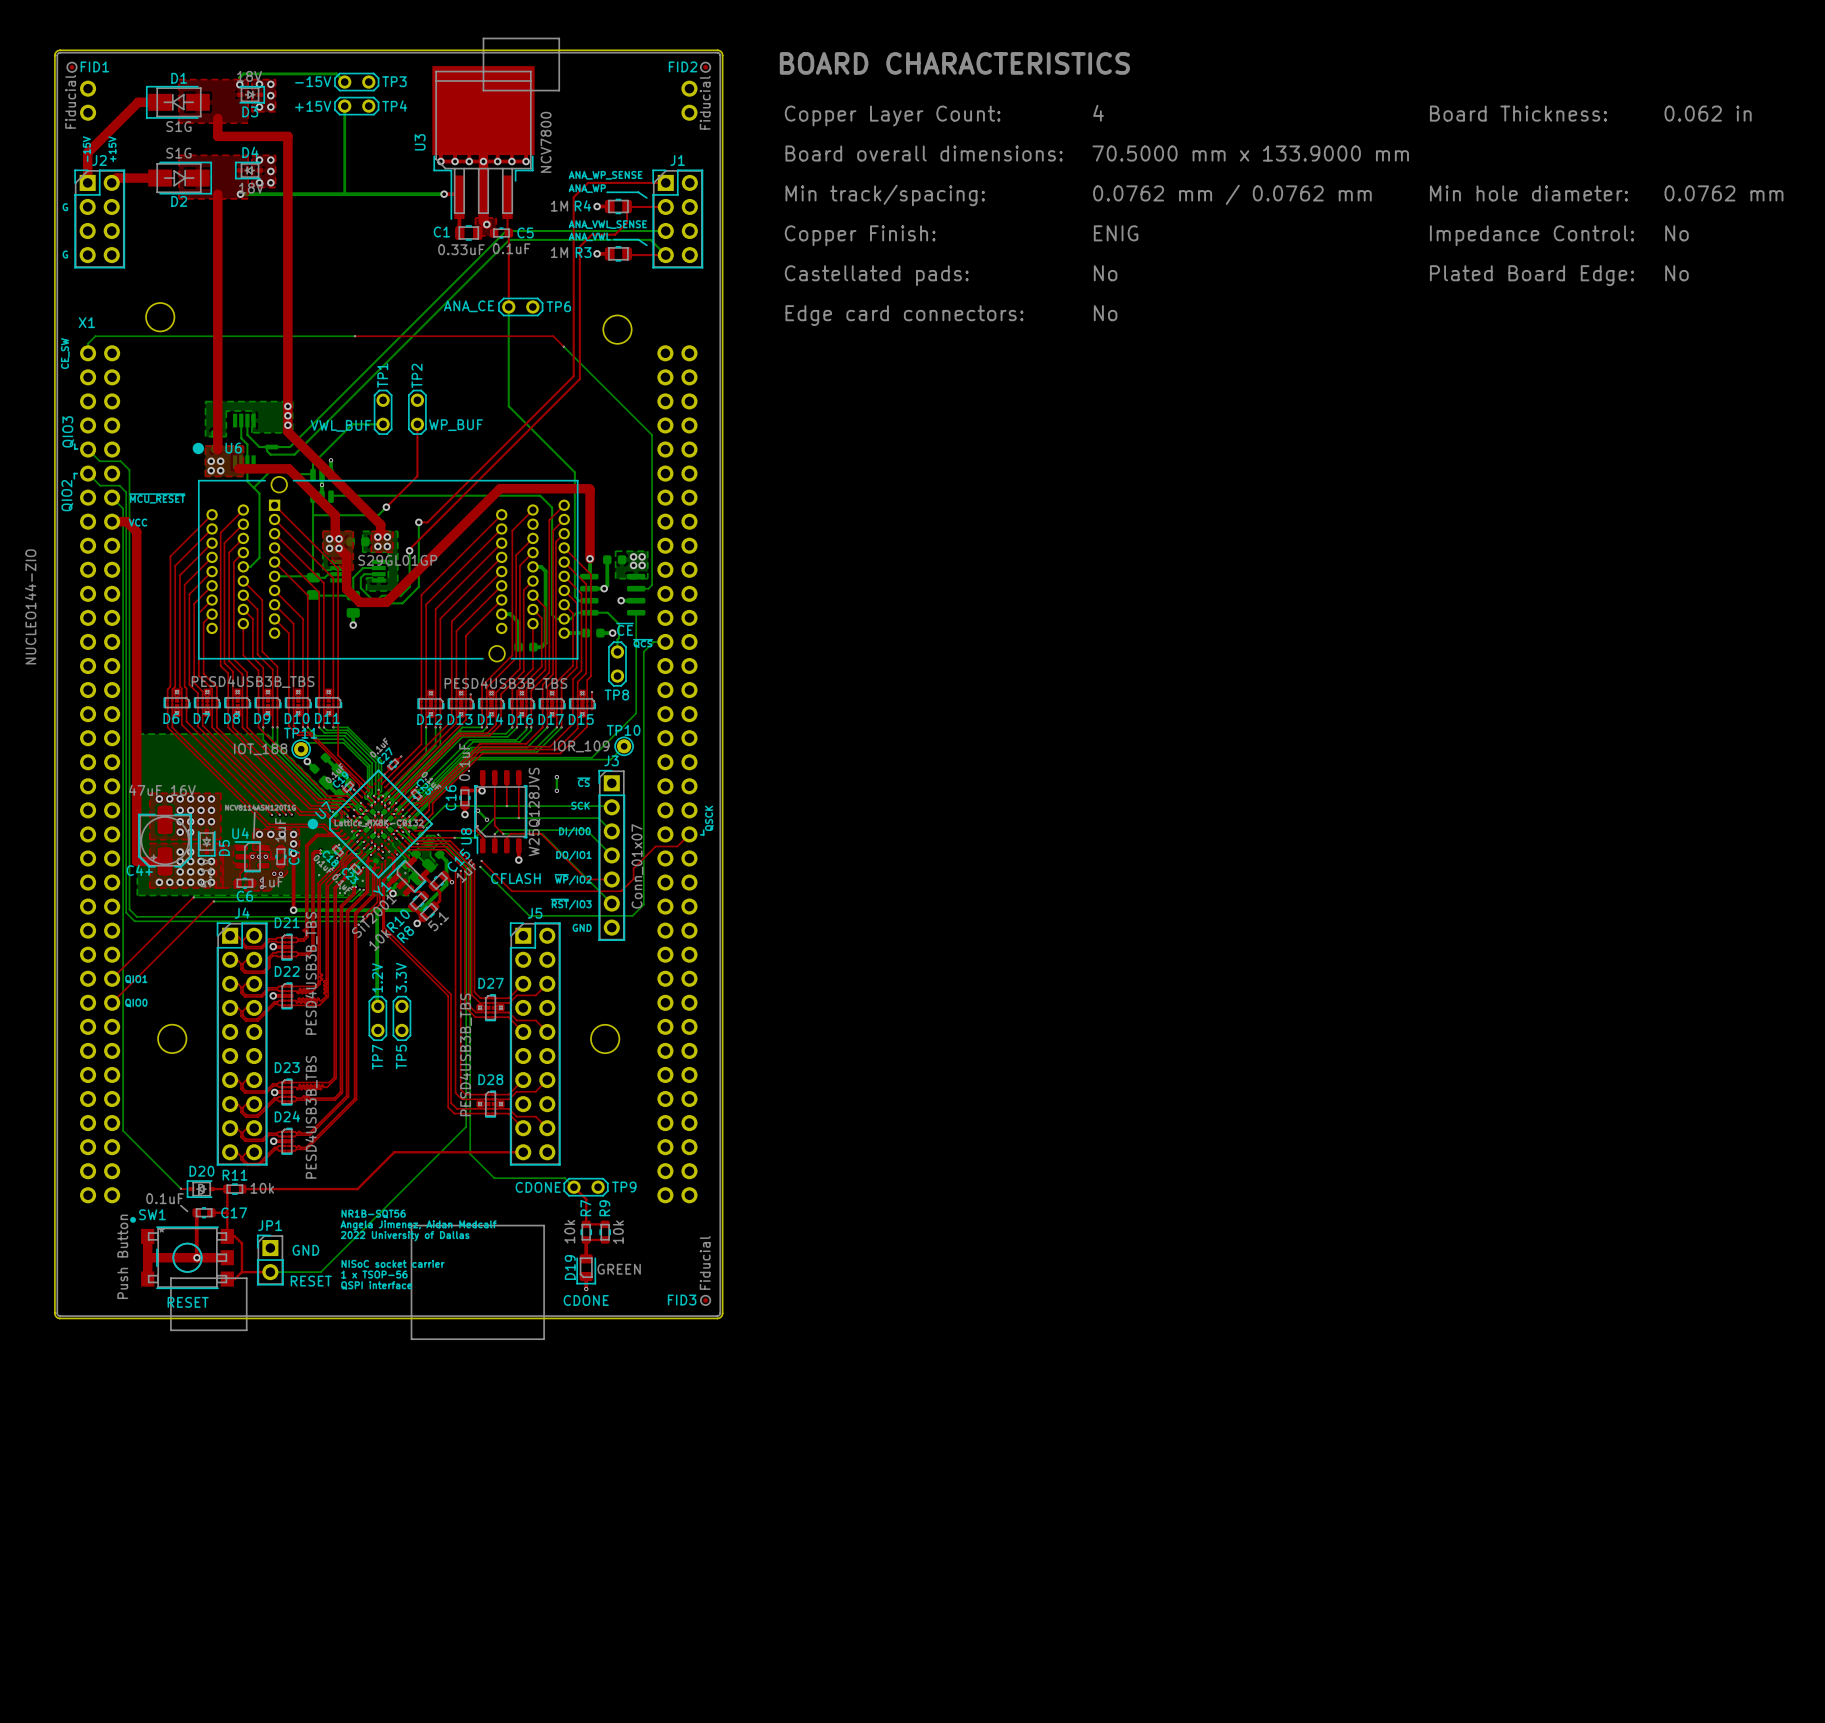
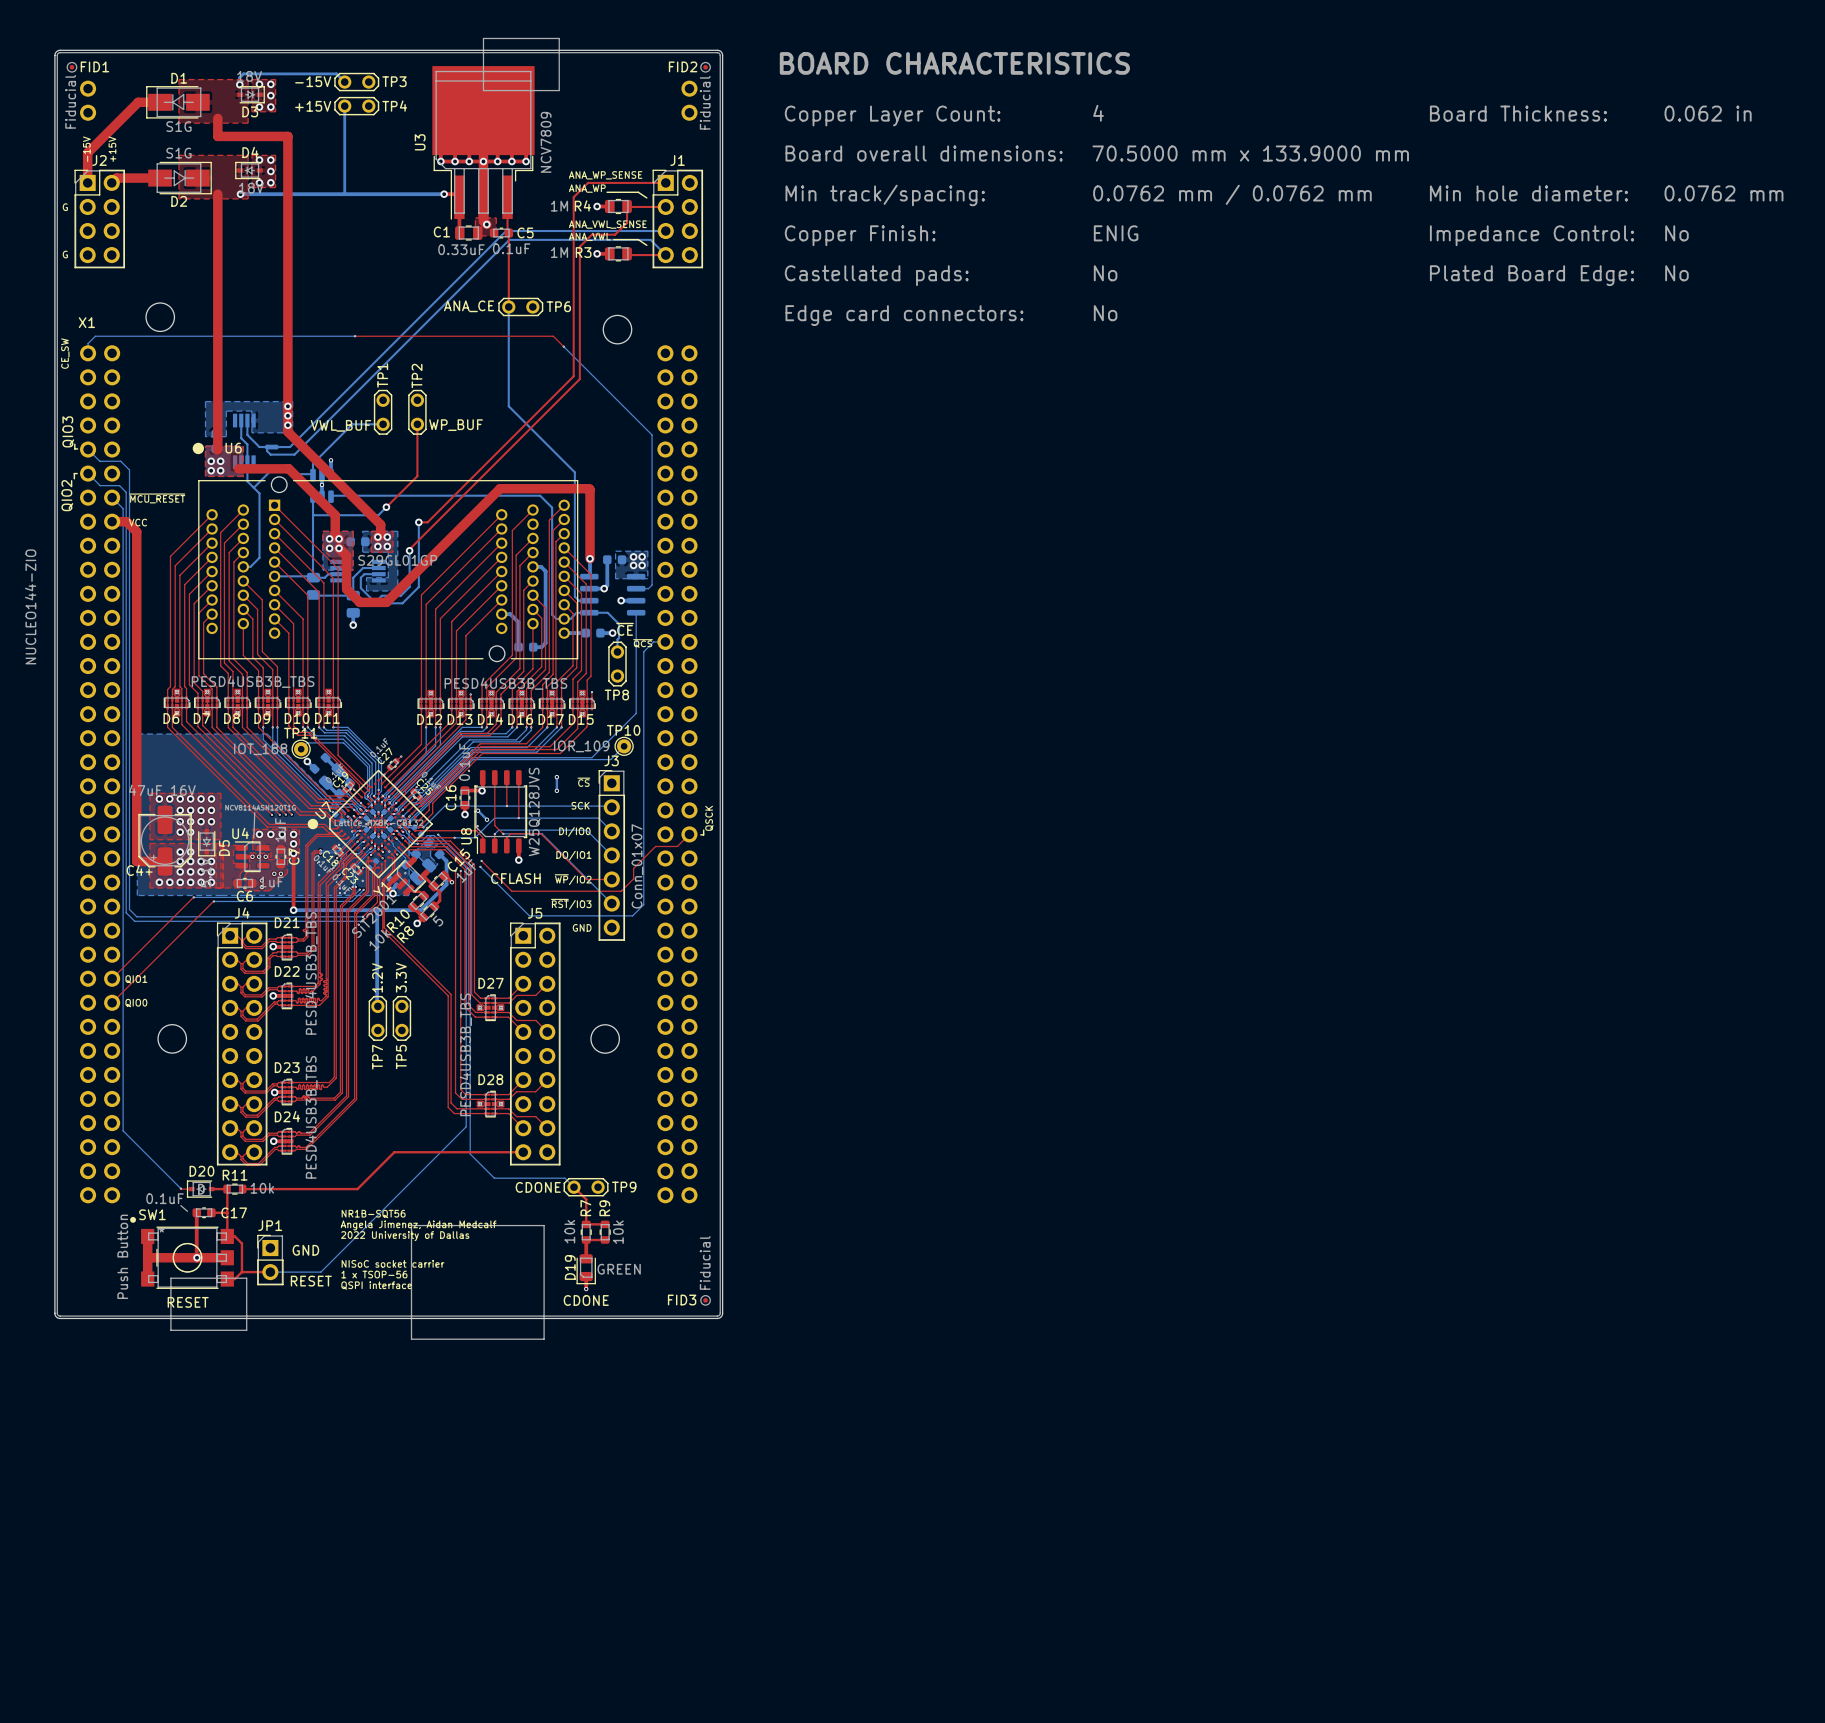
U3 value: NCV7800 (546, 142) -> NCV7809 (546, 142)
R8 value: 5.1 (438, 921) -> 5 (437, 920)

